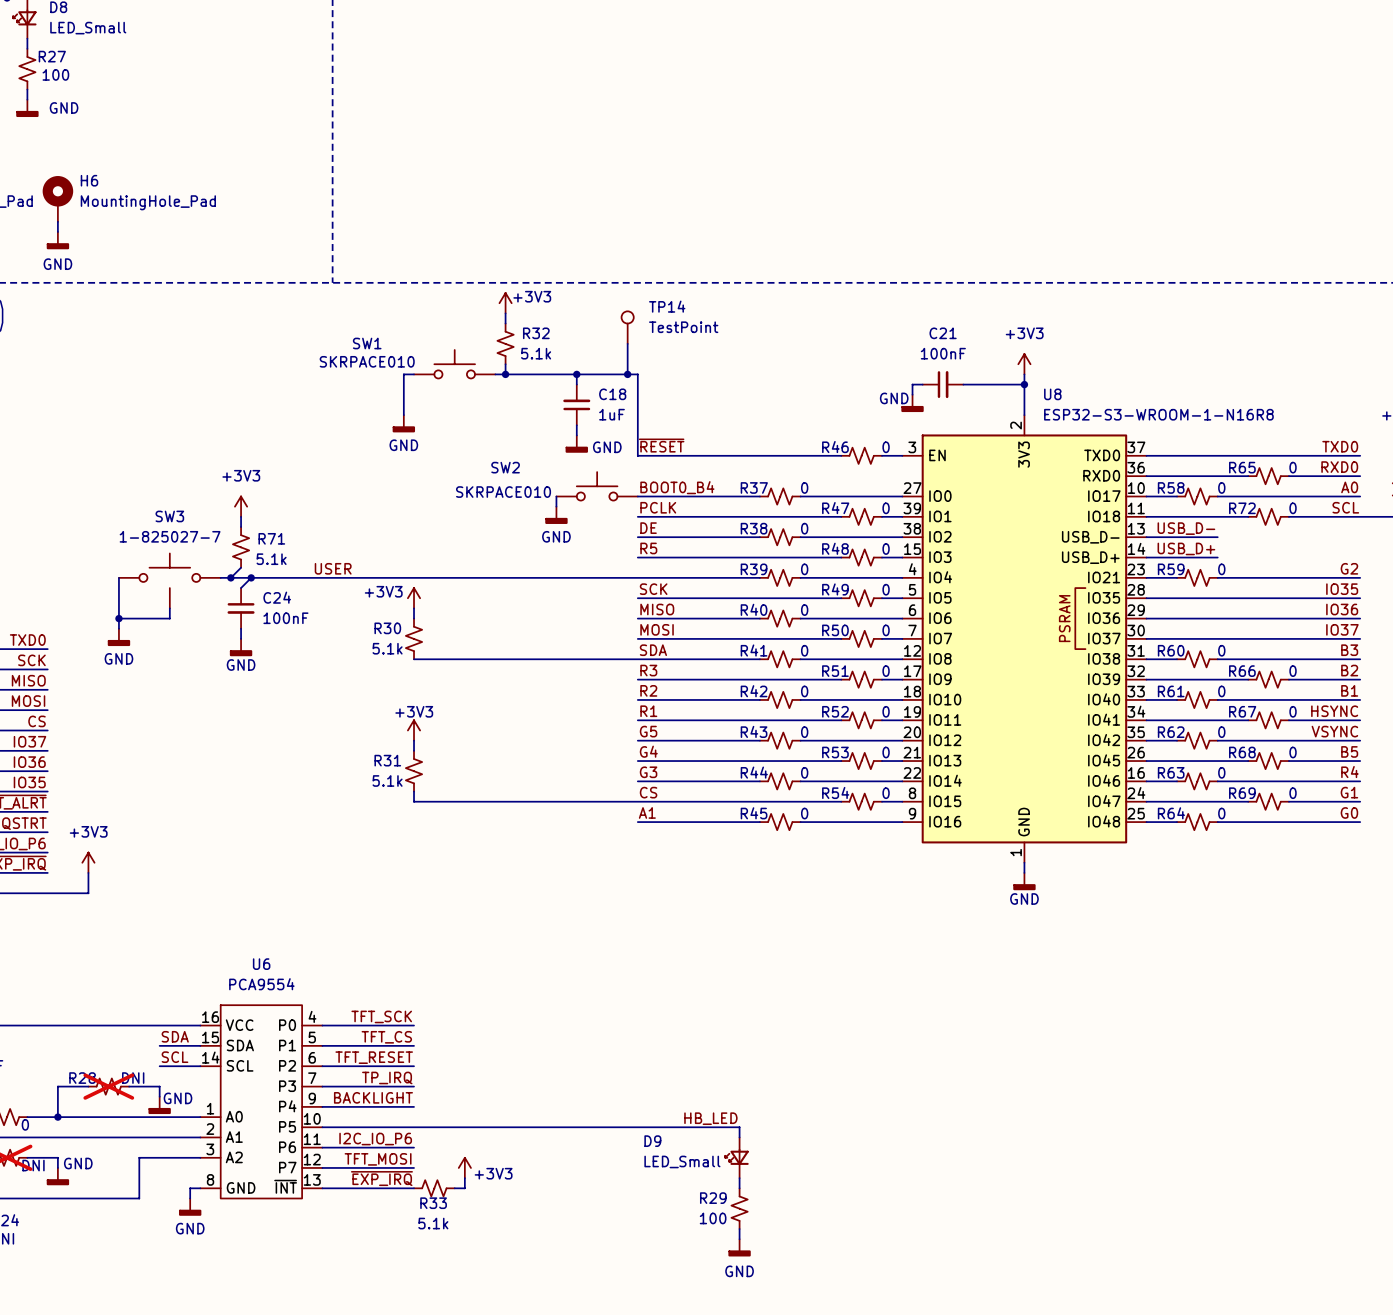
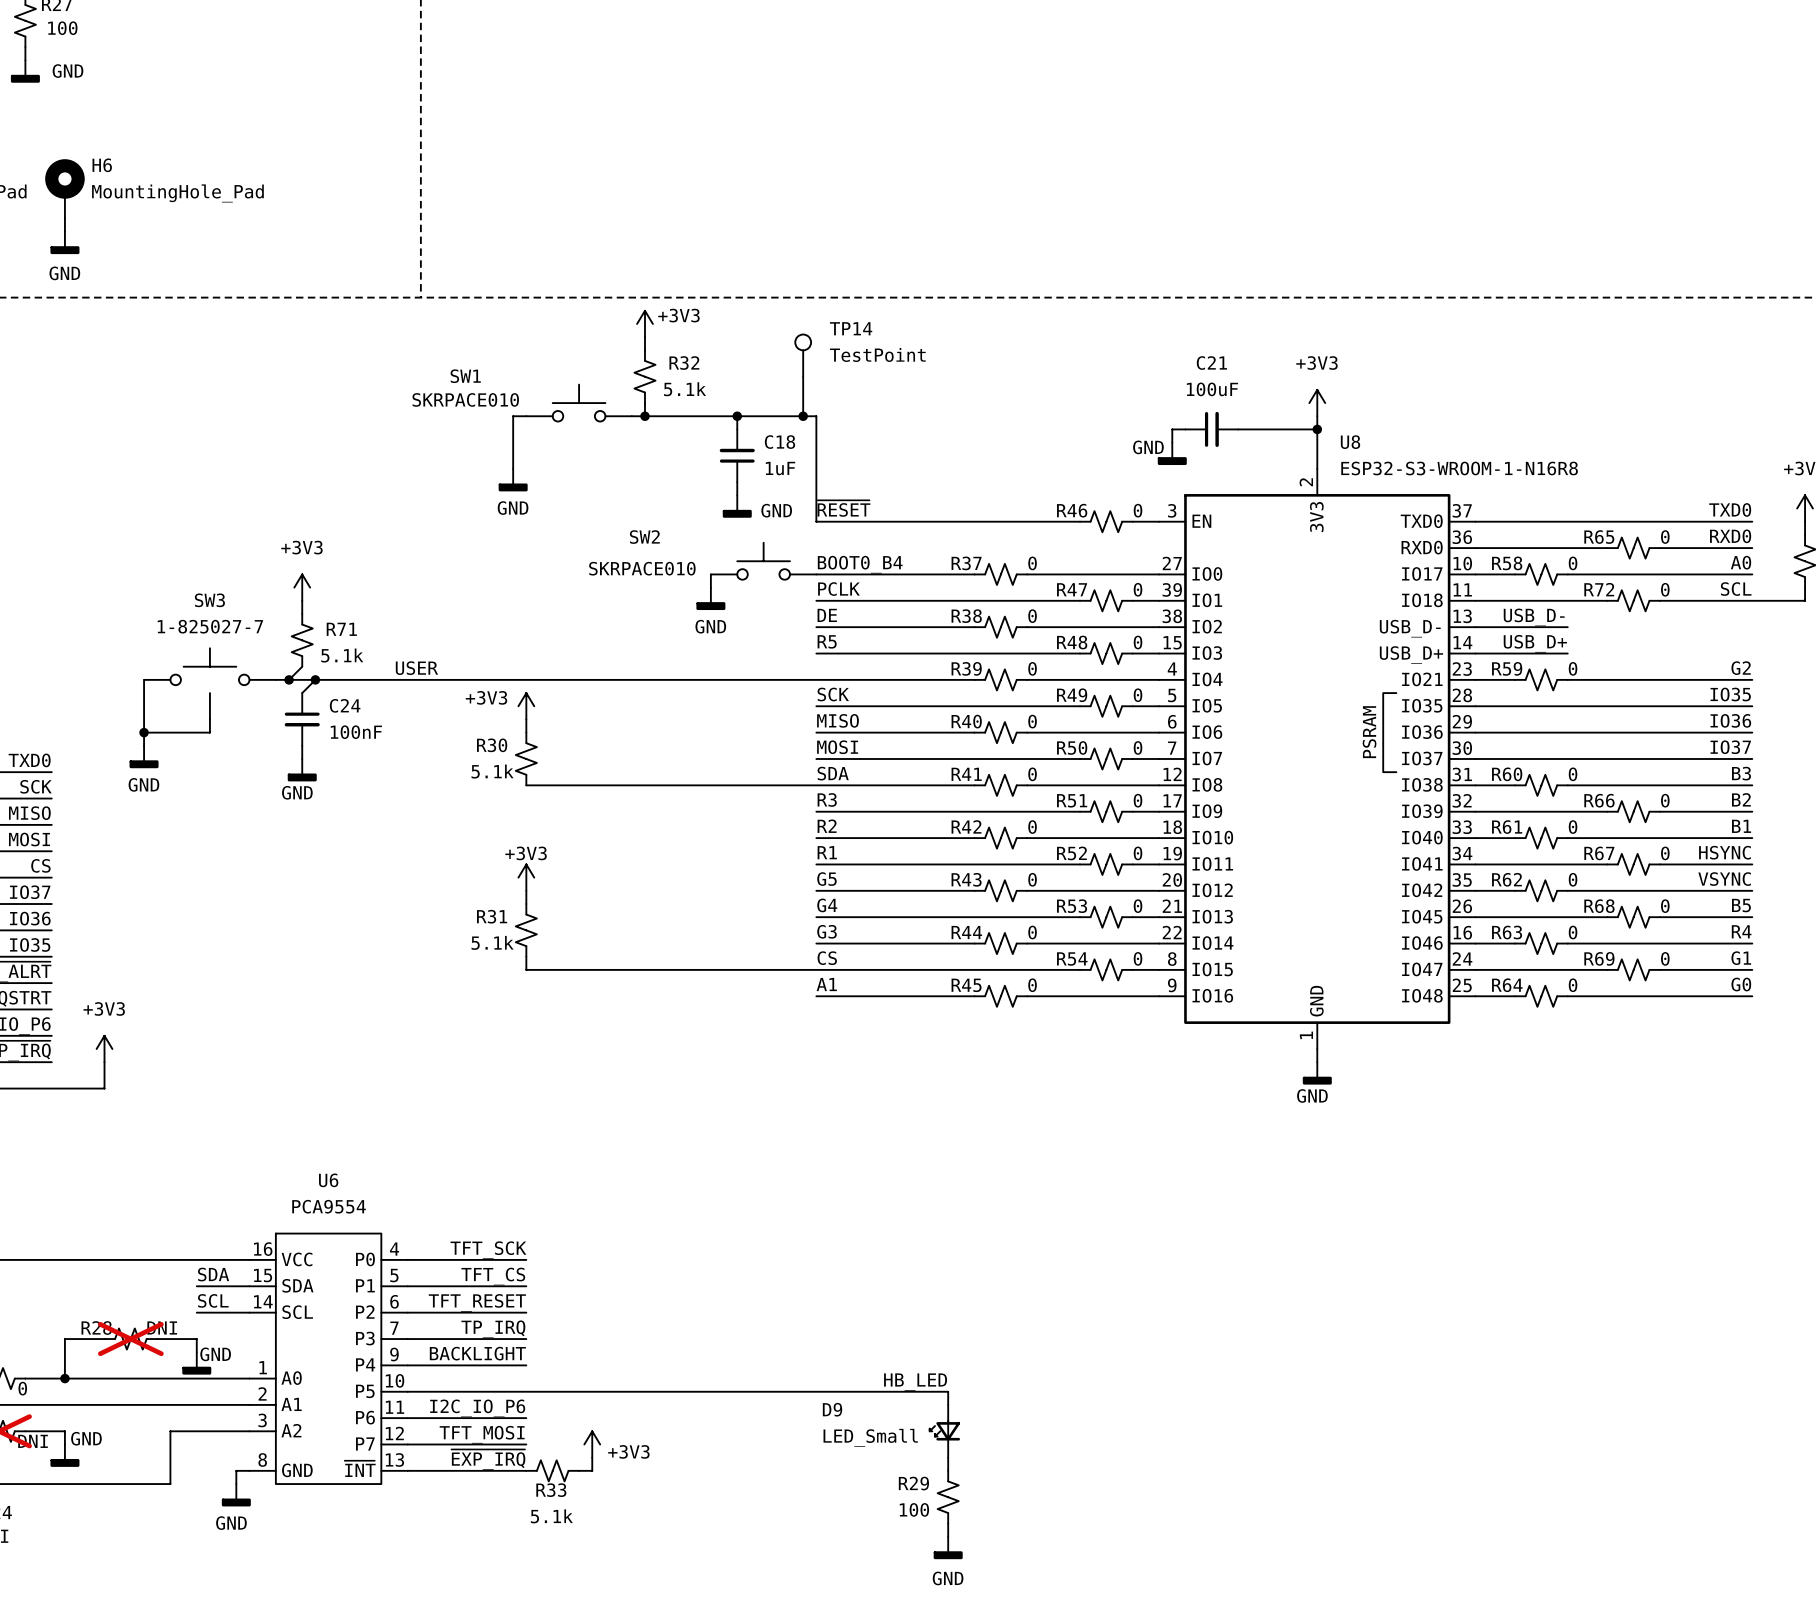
C21 value: 100nF (943, 353) -> 100uF (1212, 389)

